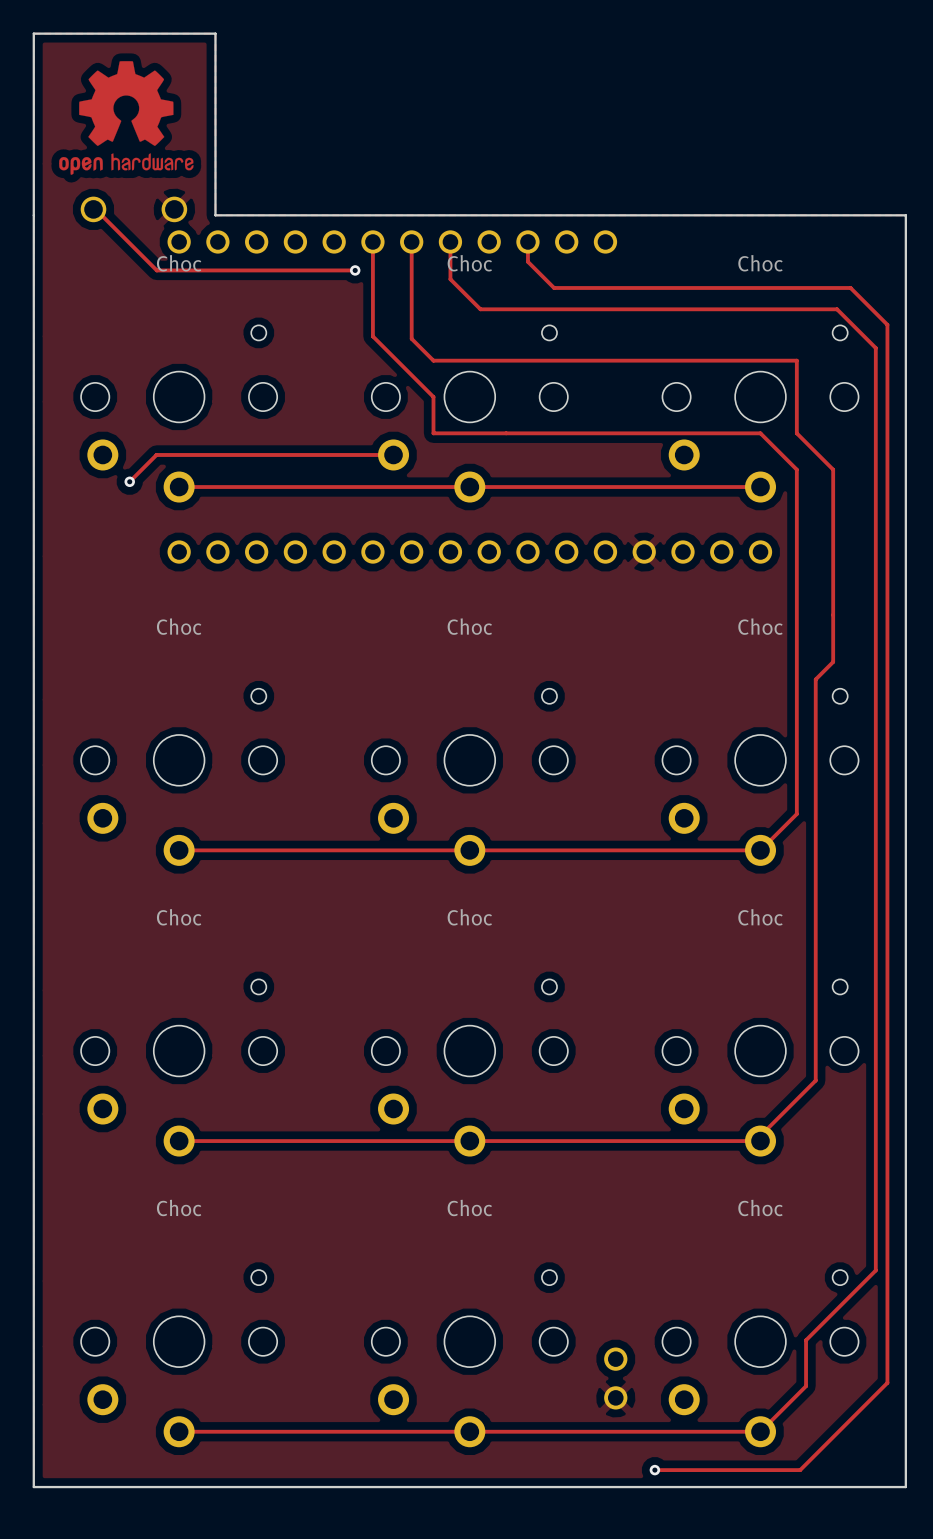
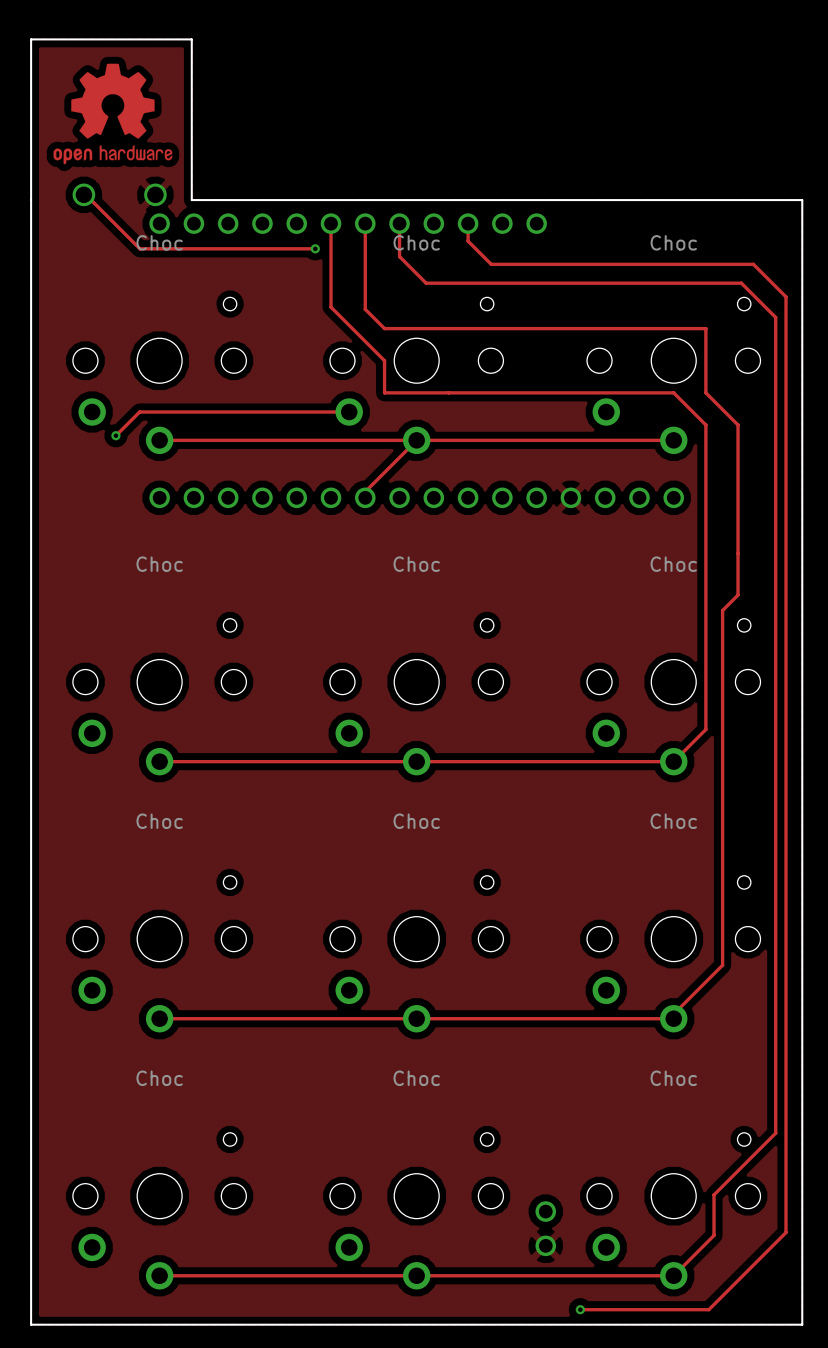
track: none -> (416, 440) (365, 491) (365, 497)

